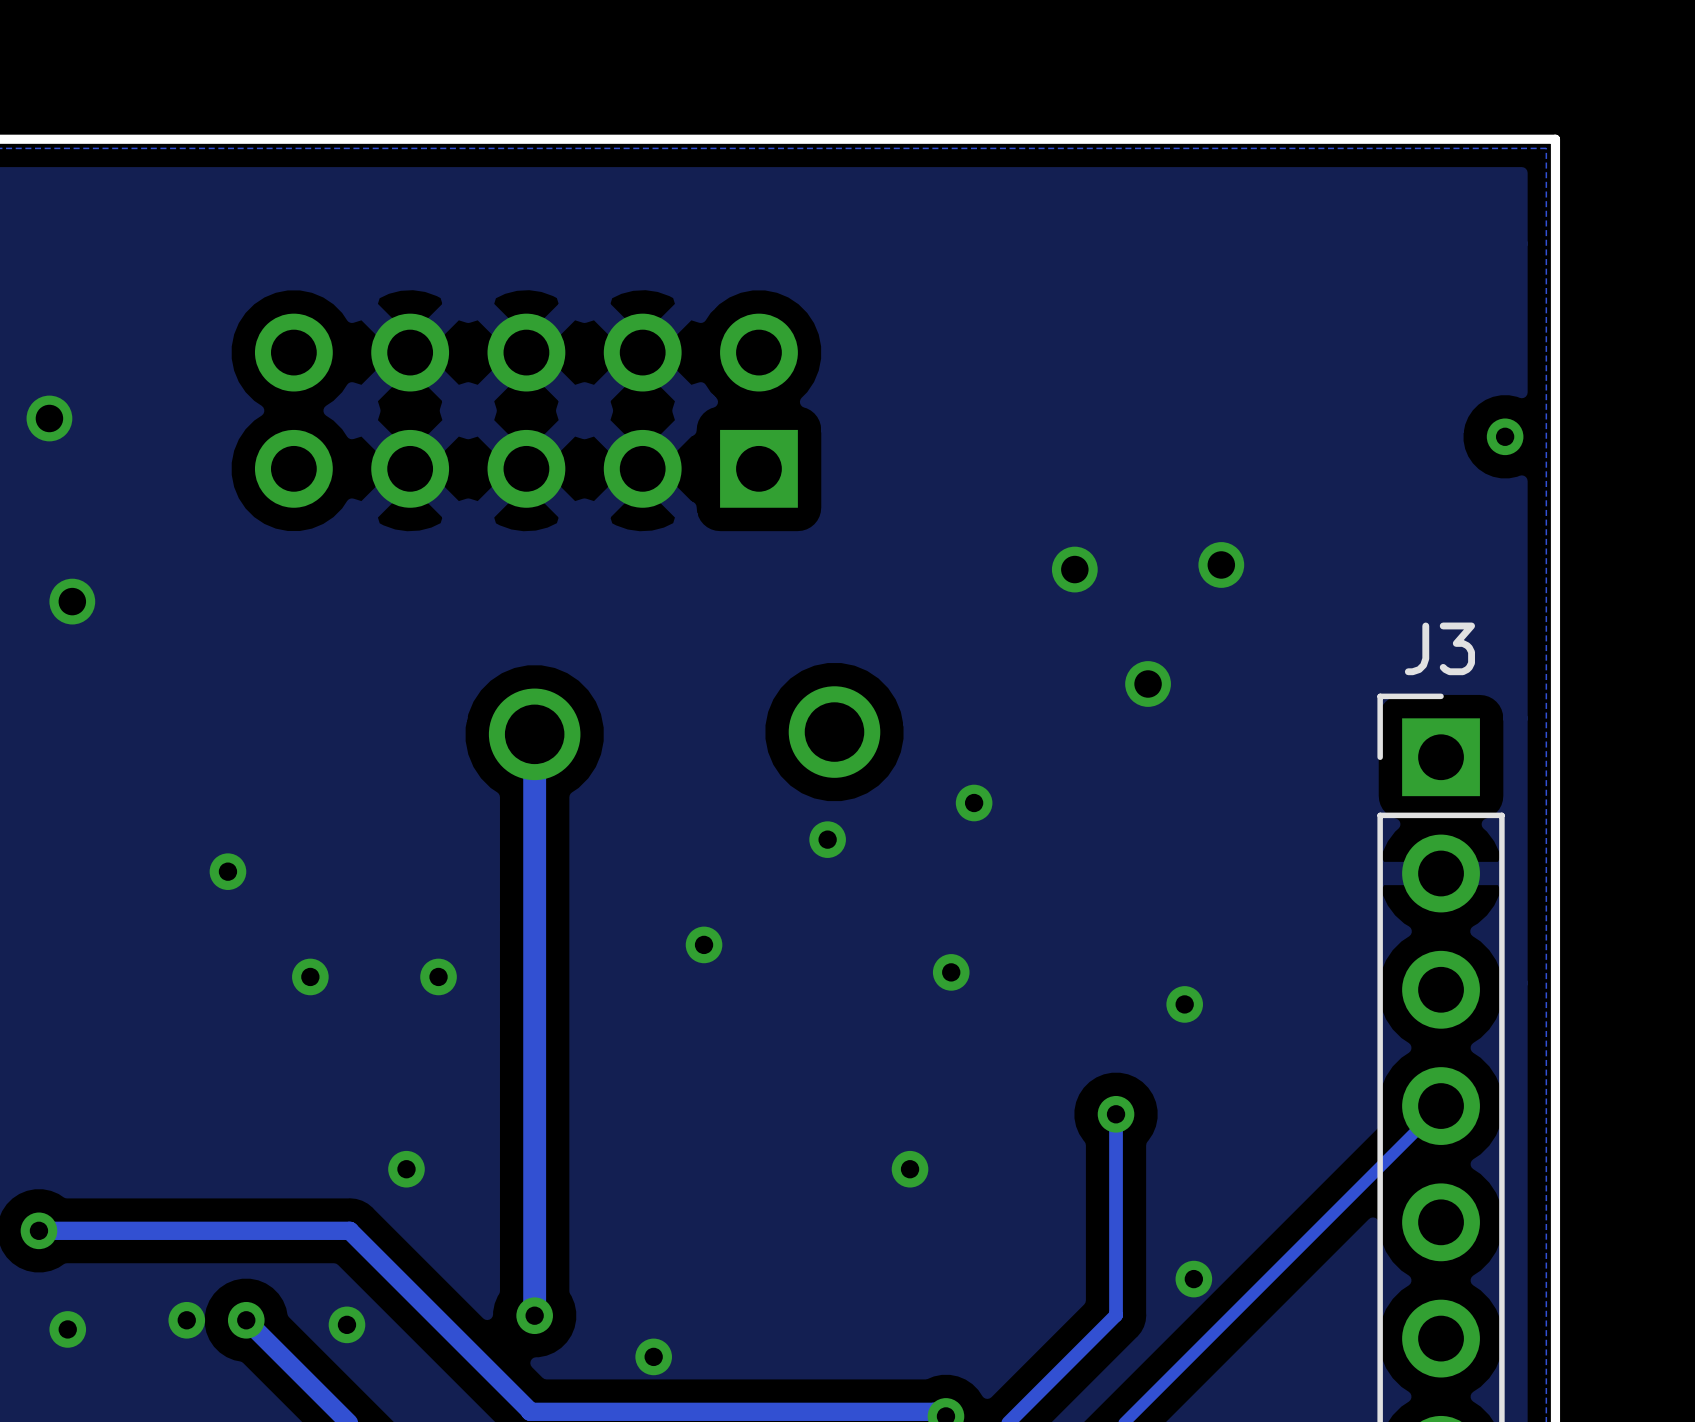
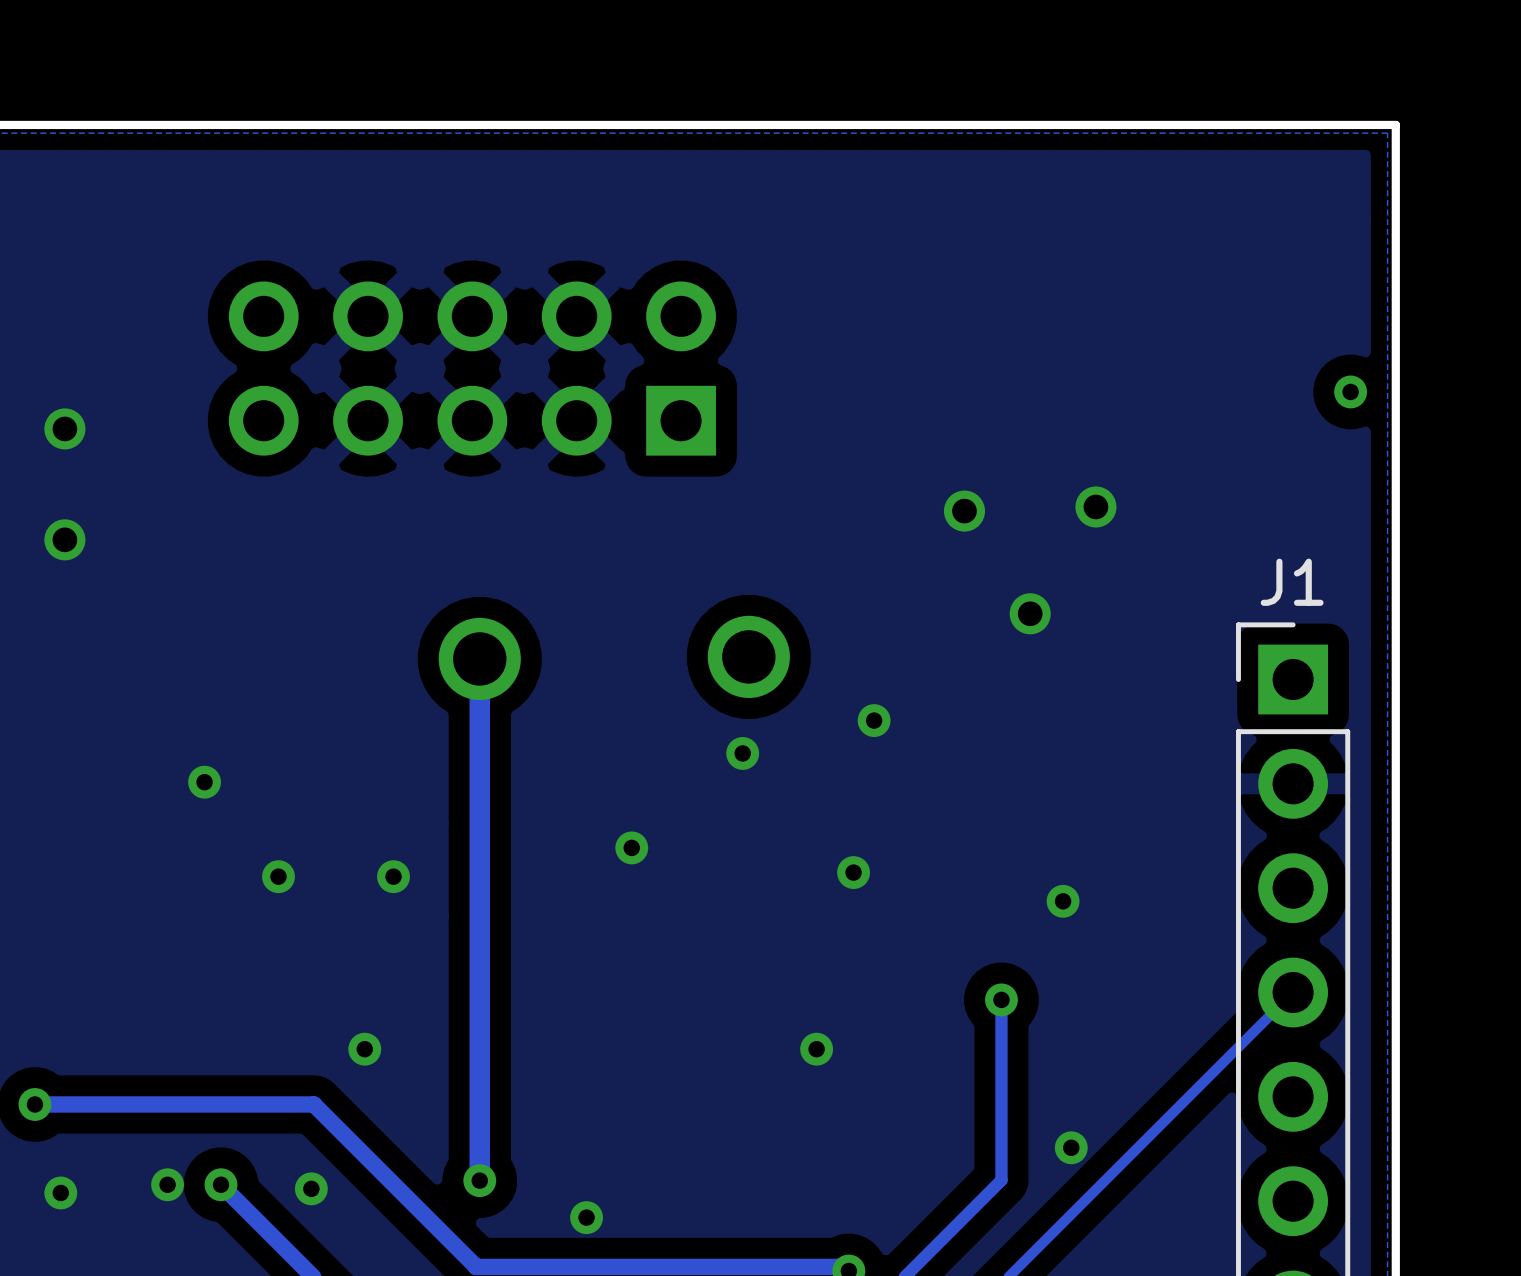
via position: (49, 418) -> (64, 428)
J3 name: J3 (1439, 648) -> J1 (1292, 582)

